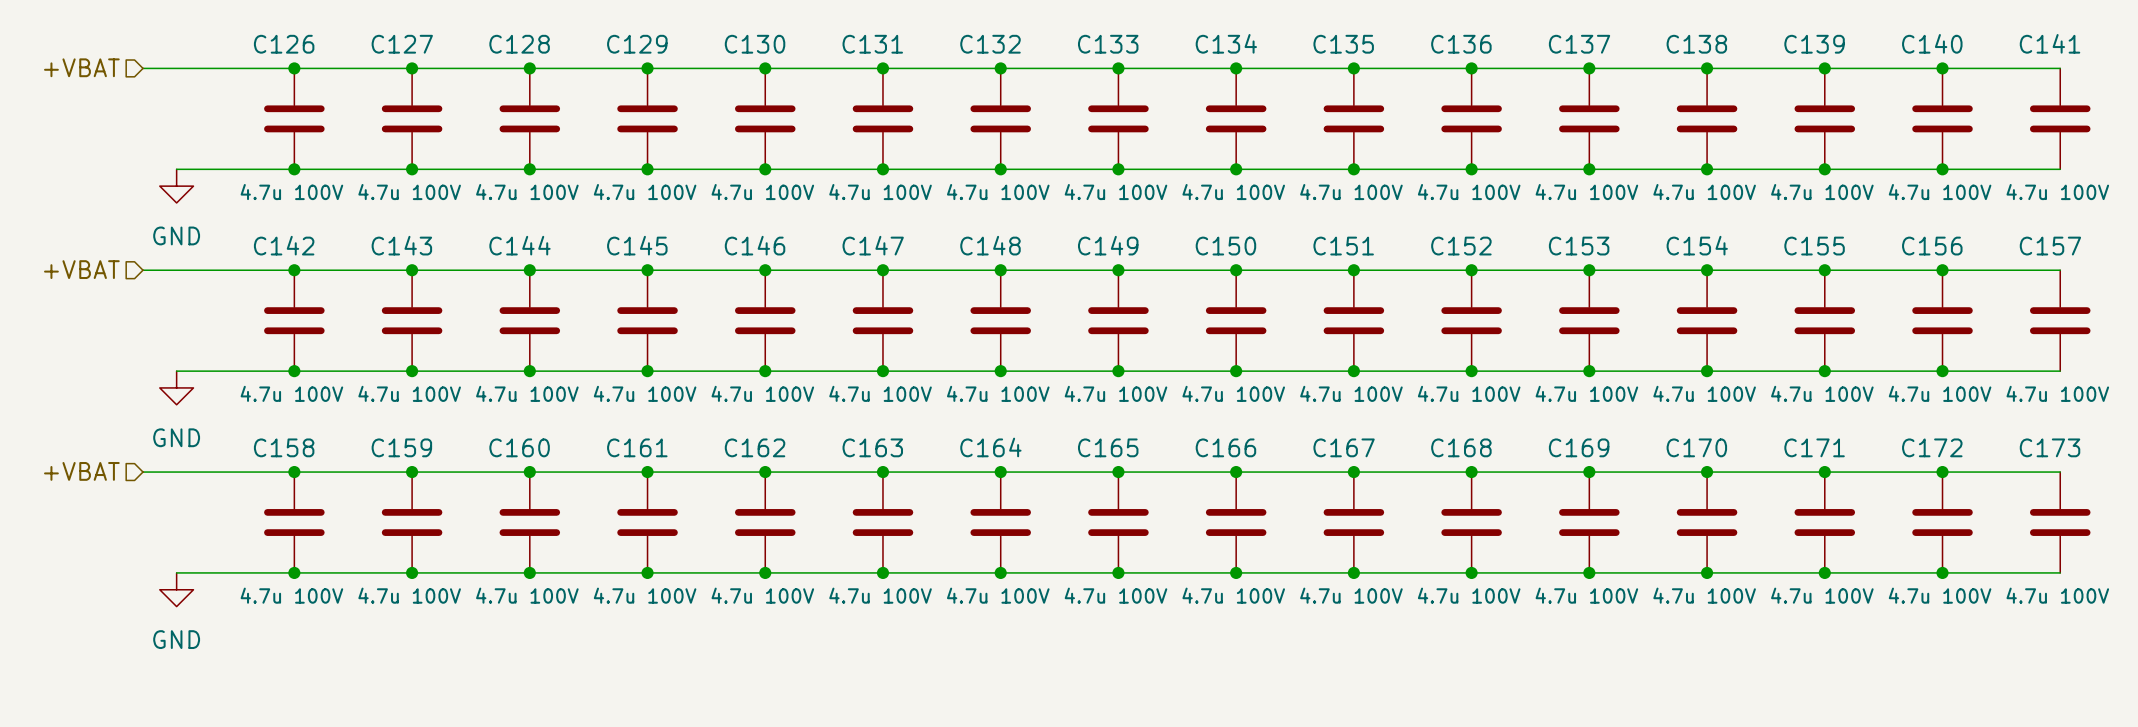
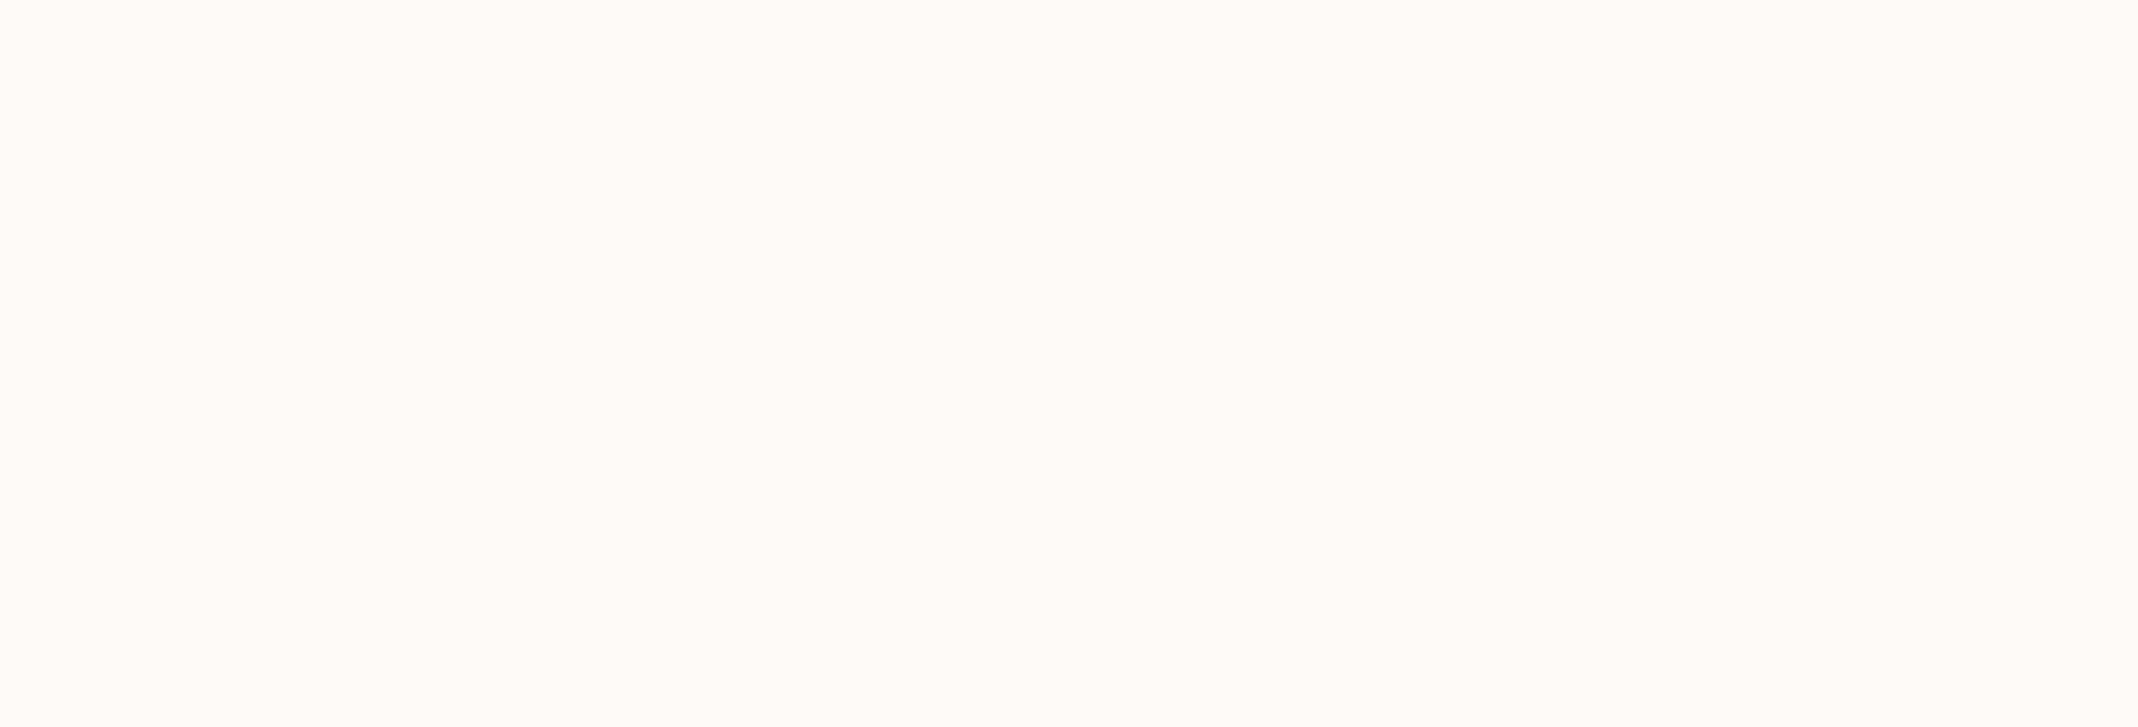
hierarchical label: +VBAT (81, 67) -> none
wire: (143, 68) (2060, 68) -> none
junction: (294, 68) -> none
junction: (412, 68) -> none
junction: (529, 68) -> none
junction: (647, 68) -> none
junction: (765, 68) -> none
junction: (882, 68) -> none
junction: (1000, 68) -> none
junction: (1118, 68) -> none
junction: (1236, 68) -> none
junction: (1353, 68) -> none
junction: (1471, 68) -> none
junction: (1589, 68) -> none
junction: (1707, 68) -> none
junction: (1824, 68) -> none
junction: (1942, 68) -> none
C126: 4.7u 100V (294, 118) -> none
C127: 4.7u 100V (412, 118) -> none
C128: 4.7u 100V (529, 118) -> none
C129: 4.7u 100V (647, 118) -> none
C130: 4.7u 100V (765, 118) -> none
C131: 4.7u 100V (882, 118) -> none
C132: 4.7u 100V (1000, 118) -> none
C133: 4.7u 100V (1118, 118) -> none
C134: 4.7u 100V (1236, 118) -> none
C135: 4.7u 100V (1353, 118) -> none
C136: 4.7u 100V (1471, 118) -> none
C137: 4.7u 100V (1589, 118) -> none
C138: 4.7u 100V (1707, 118) -> none
C139: 4.7u 100V (1824, 118) -> none
C140: 4.7u 100V (1942, 118) -> none
C141: 4.7u 100V (2060, 118) -> none
wire: (176, 169) (2060, 169) -> none
junction: (294, 169) -> none
junction: (412, 169) -> none
junction: (529, 169) -> none
junction: (647, 169) -> none
junction: (765, 169) -> none
junction: (882, 169) -> none
junction: (1000, 169) -> none
junction: (1118, 169) -> none
junction: (1236, 169) -> none
junction: (1353, 169) -> none
junction: (1471, 169) -> none
junction: (1589, 169) -> none
junction: (1707, 169) -> none
junction: (1824, 169) -> none
junction: (1942, 169) -> none
power symbol: GND (176, 186) -> none
hierarchical label: +VBAT (81, 269) -> none
wire: (143, 270) (2060, 270) -> none
junction: (294, 270) -> none
junction: (412, 270) -> none
junction: (529, 270) -> none
junction: (647, 270) -> none
junction: (765, 270) -> none
junction: (882, 270) -> none
junction: (1000, 270) -> none
junction: (1118, 270) -> none
junction: (1236, 270) -> none
junction: (1353, 270) -> none
junction: (1471, 270) -> none
junction: (1589, 270) -> none
junction: (1707, 270) -> none
junction: (1824, 270) -> none
junction: (1942, 270) -> none
C142: 4.7u 100V (294, 320) -> none
C143: 4.7u 100V (412, 320) -> none
C144: 4.7u 100V (529, 320) -> none
C145: 4.7u 100V (647, 320) -> none
C146: 4.7u 100V (765, 320) -> none
C147: 4.7u 100V (882, 320) -> none
C148: 4.7u 100V (1000, 320) -> none
C149: 4.7u 100V (1118, 320) -> none
C150: 4.7u 100V (1236, 320) -> none
C151: 4.7u 100V (1353, 320) -> none
C152: 4.7u 100V (1471, 320) -> none
C153: 4.7u 100V (1589, 320) -> none
C154: 4.7u 100V (1707, 320) -> none
C155: 4.7u 100V (1824, 320) -> none
C156: 4.7u 100V (1942, 320) -> none
C157: 4.7u 100V (2060, 320) -> none
wire: (176, 371) (2060, 371) -> none
junction: (294, 371) -> none
junction: (412, 371) -> none
junction: (529, 371) -> none
junction: (647, 371) -> none
junction: (765, 371) -> none
junction: (882, 371) -> none
junction: (1000, 371) -> none
junction: (1118, 371) -> none
junction: (1236, 371) -> none
junction: (1353, 371) -> none
junction: (1471, 371) -> none
junction: (1589, 371) -> none
junction: (1707, 371) -> none
junction: (1824, 371) -> none
junction: (1942, 371) -> none
power symbol: GND (176, 387) -> none
hierarchical label: +VBAT (81, 471) -> none
wire: (143, 472) (2060, 472) -> none
junction: (294, 472) -> none
junction: (412, 472) -> none
junction: (529, 472) -> none
junction: (647, 472) -> none
junction: (765, 472) -> none
junction: (882, 472) -> none
junction: (1000, 472) -> none
junction: (1118, 472) -> none
junction: (1236, 472) -> none
junction: (1353, 472) -> none
junction: (1471, 472) -> none
junction: (1589, 472) -> none
junction: (1707, 472) -> none
junction: (1824, 472) -> none
junction: (1942, 472) -> none
C158: 4.7u 100V (294, 522) -> none
C159: 4.7u 100V (412, 522) -> none
C160: 4.7u 100V (529, 522) -> none
C161: 4.7u 100V (647, 522) -> none
C162: 4.7u 100V (765, 522) -> none
C163: 4.7u 100V (882, 522) -> none
C164: 4.7u 100V (1000, 522) -> none
C165: 4.7u 100V (1118, 522) -> none
C166: 4.7u 100V (1236, 522) -> none
C167: 4.7u 100V (1353, 522) -> none
C168: 4.7u 100V (1471, 522) -> none
C169: 4.7u 100V (1589, 522) -> none
C170: 4.7u 100V (1707, 522) -> none
C171: 4.7u 100V (1824, 522) -> none
C172: 4.7u 100V (1942, 522) -> none
C173: 4.7u 100V (2060, 522) -> none
wire: (176, 572) (2060, 572) -> none
junction: (294, 572) -> none
junction: (412, 572) -> none
junction: (529, 572) -> none
junction: (647, 572) -> none
junction: (765, 572) -> none
junction: (882, 572) -> none
junction: (1000, 572) -> none
junction: (1118, 572) -> none
junction: (1236, 572) -> none
junction: (1353, 572) -> none
junction: (1471, 572) -> none
junction: (1589, 572) -> none
junction: (1707, 572) -> none
junction: (1824, 572) -> none
junction: (1942, 572) -> none
power symbol: GND (176, 589) -> none

